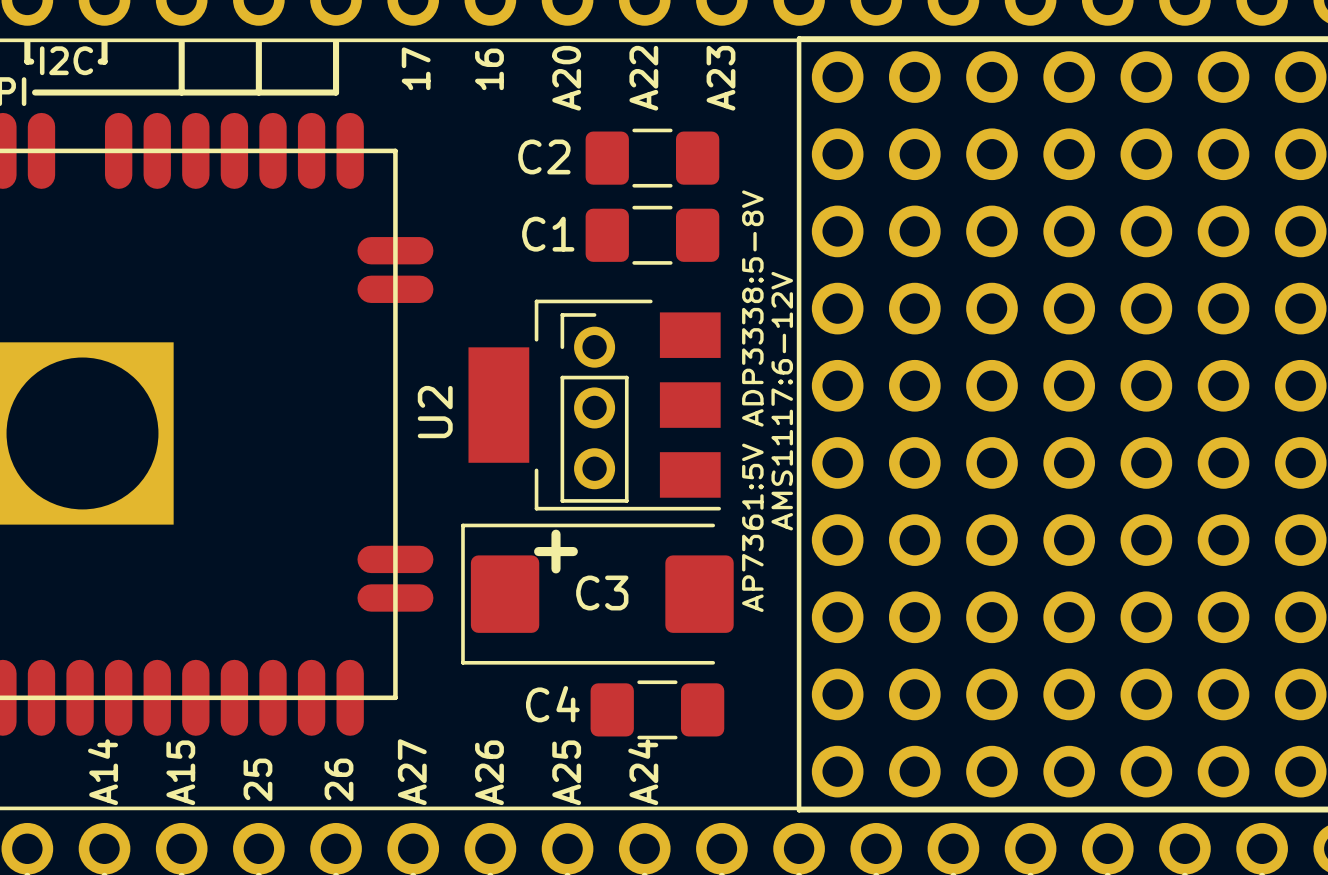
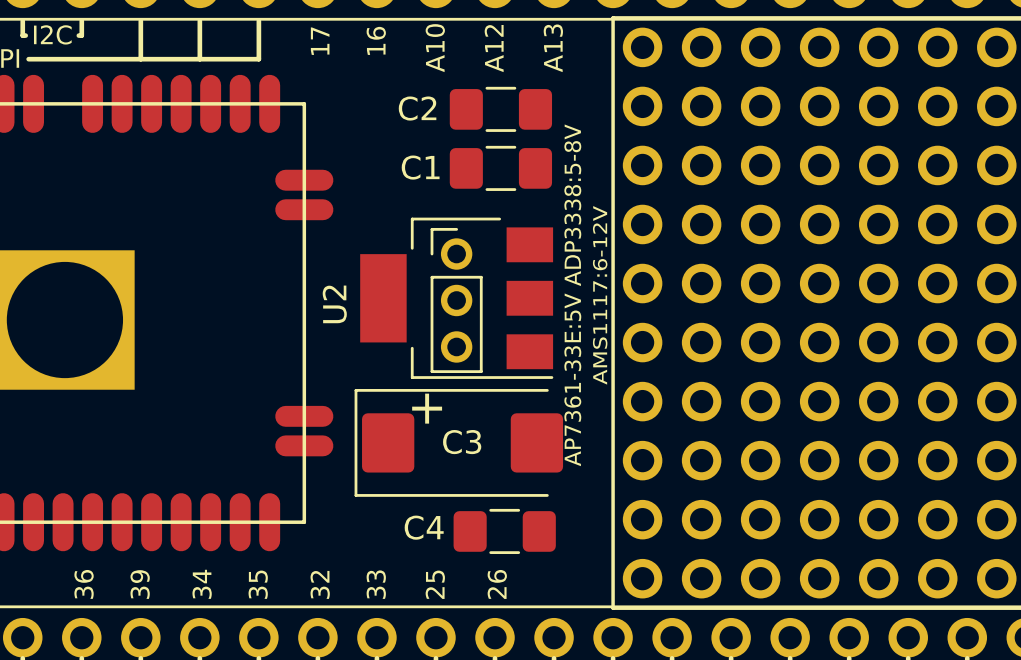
text: A20 (566, 78) -> A10 (435, 48)
text: A22 (643, 78) -> A12 (494, 48)
text: A23 (721, 78) -> A13 (553, 48)
text: AP7361:5V ADP3338:5-8V (752, 401) -> AP7361-33E:5V ADP3338:5-8V (572, 295)
text: A14 (103, 772) -> 36 (84, 584)
text: A15 (180, 772) -> 39 (140, 584)
text: A27 (412, 772) -> 32 (320, 584)
text: A26 (489, 772) -> 33 (376, 584)
text: A25 (566, 772) -> 25 (435, 584)
text: A24 (643, 772) -> 26 (497, 584)
text: 25 (257, 779) -> 34 (202, 584)
text: 26 (338, 779) -> 35 (258, 584)

